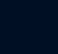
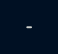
board edge: none -> (27, 27) (31, 27)

